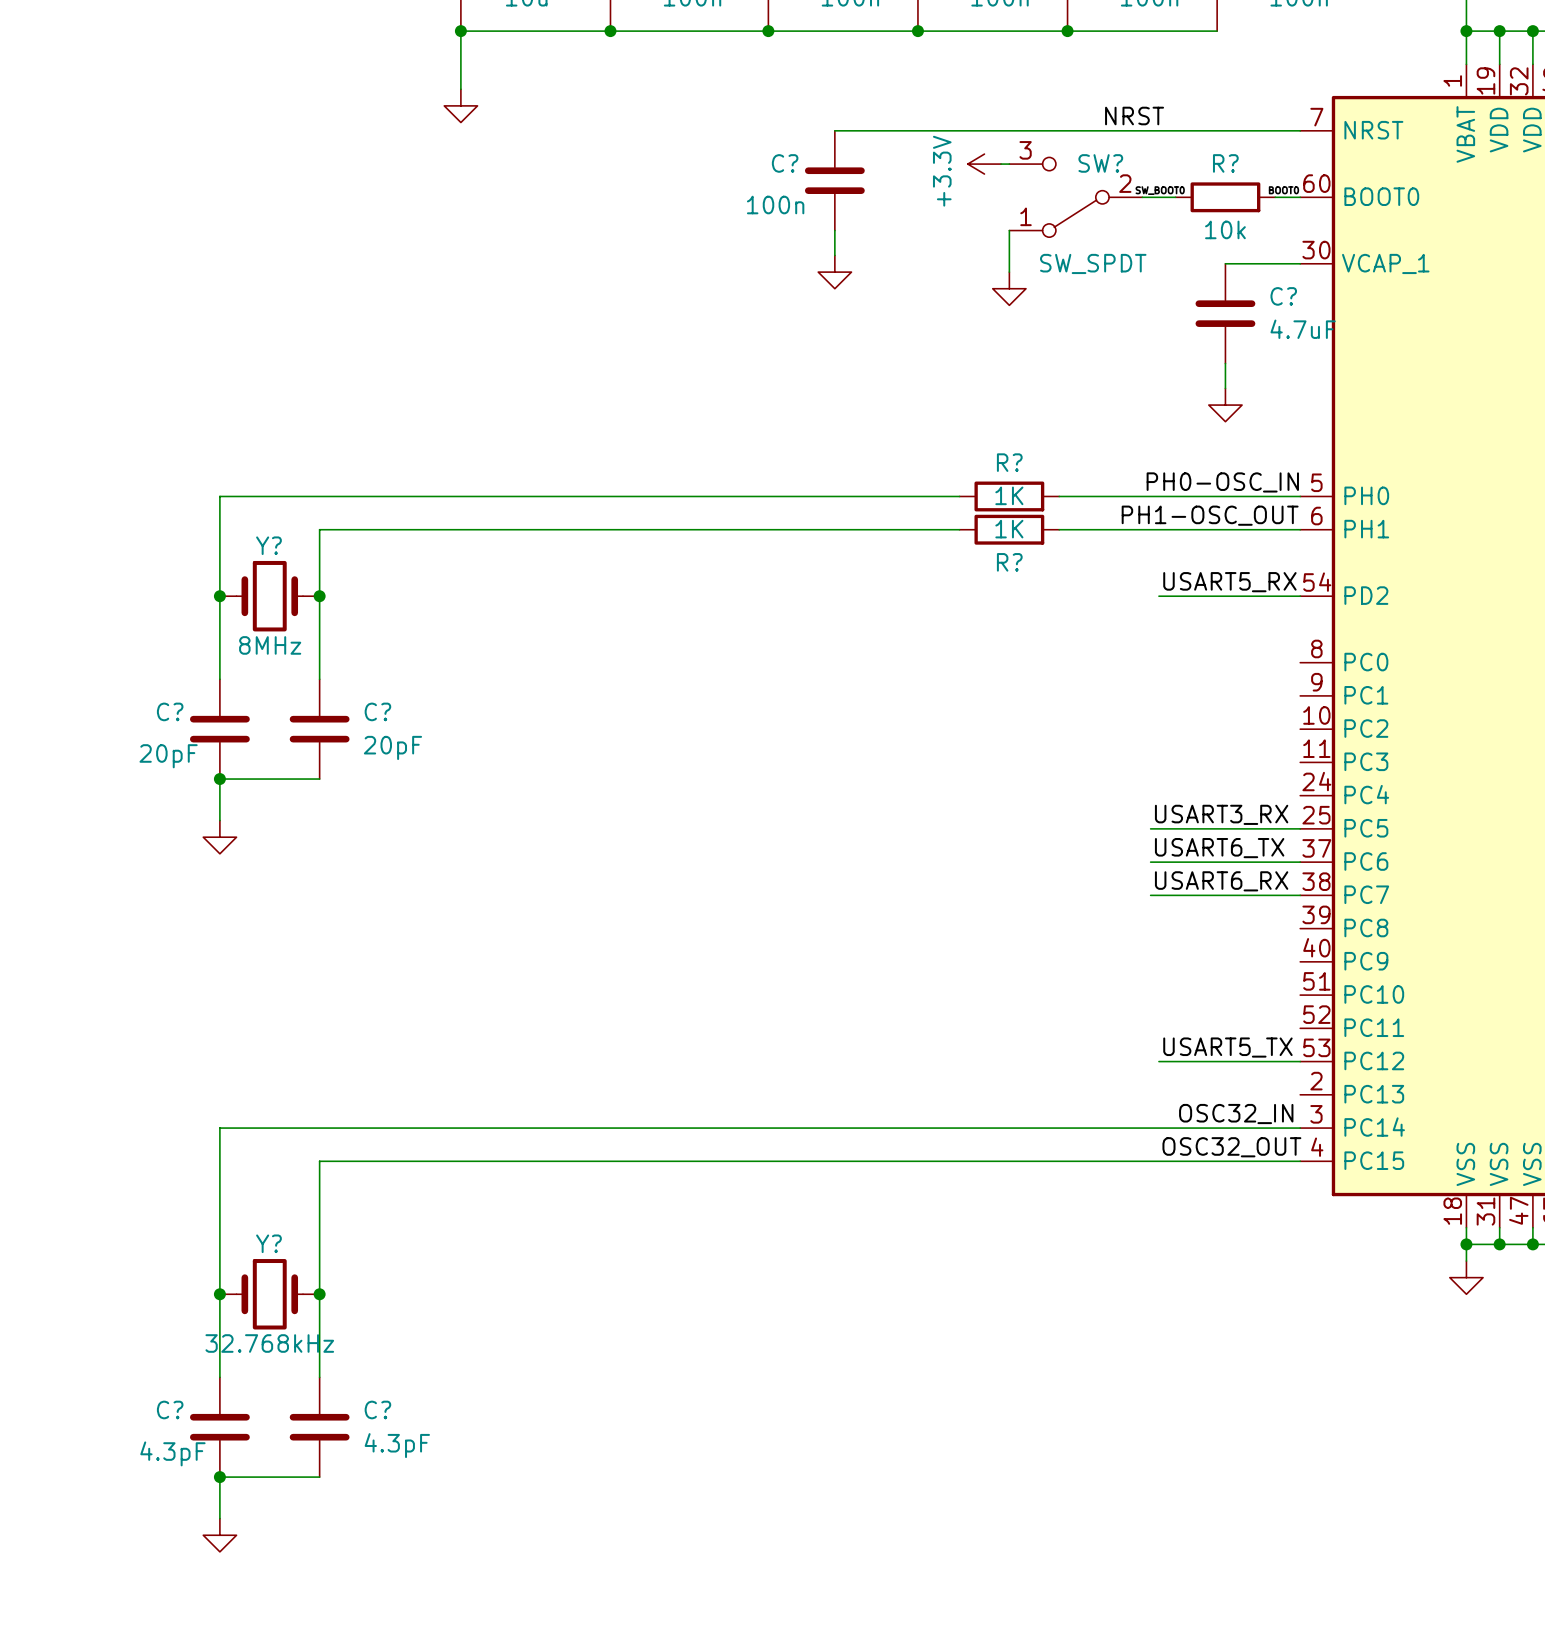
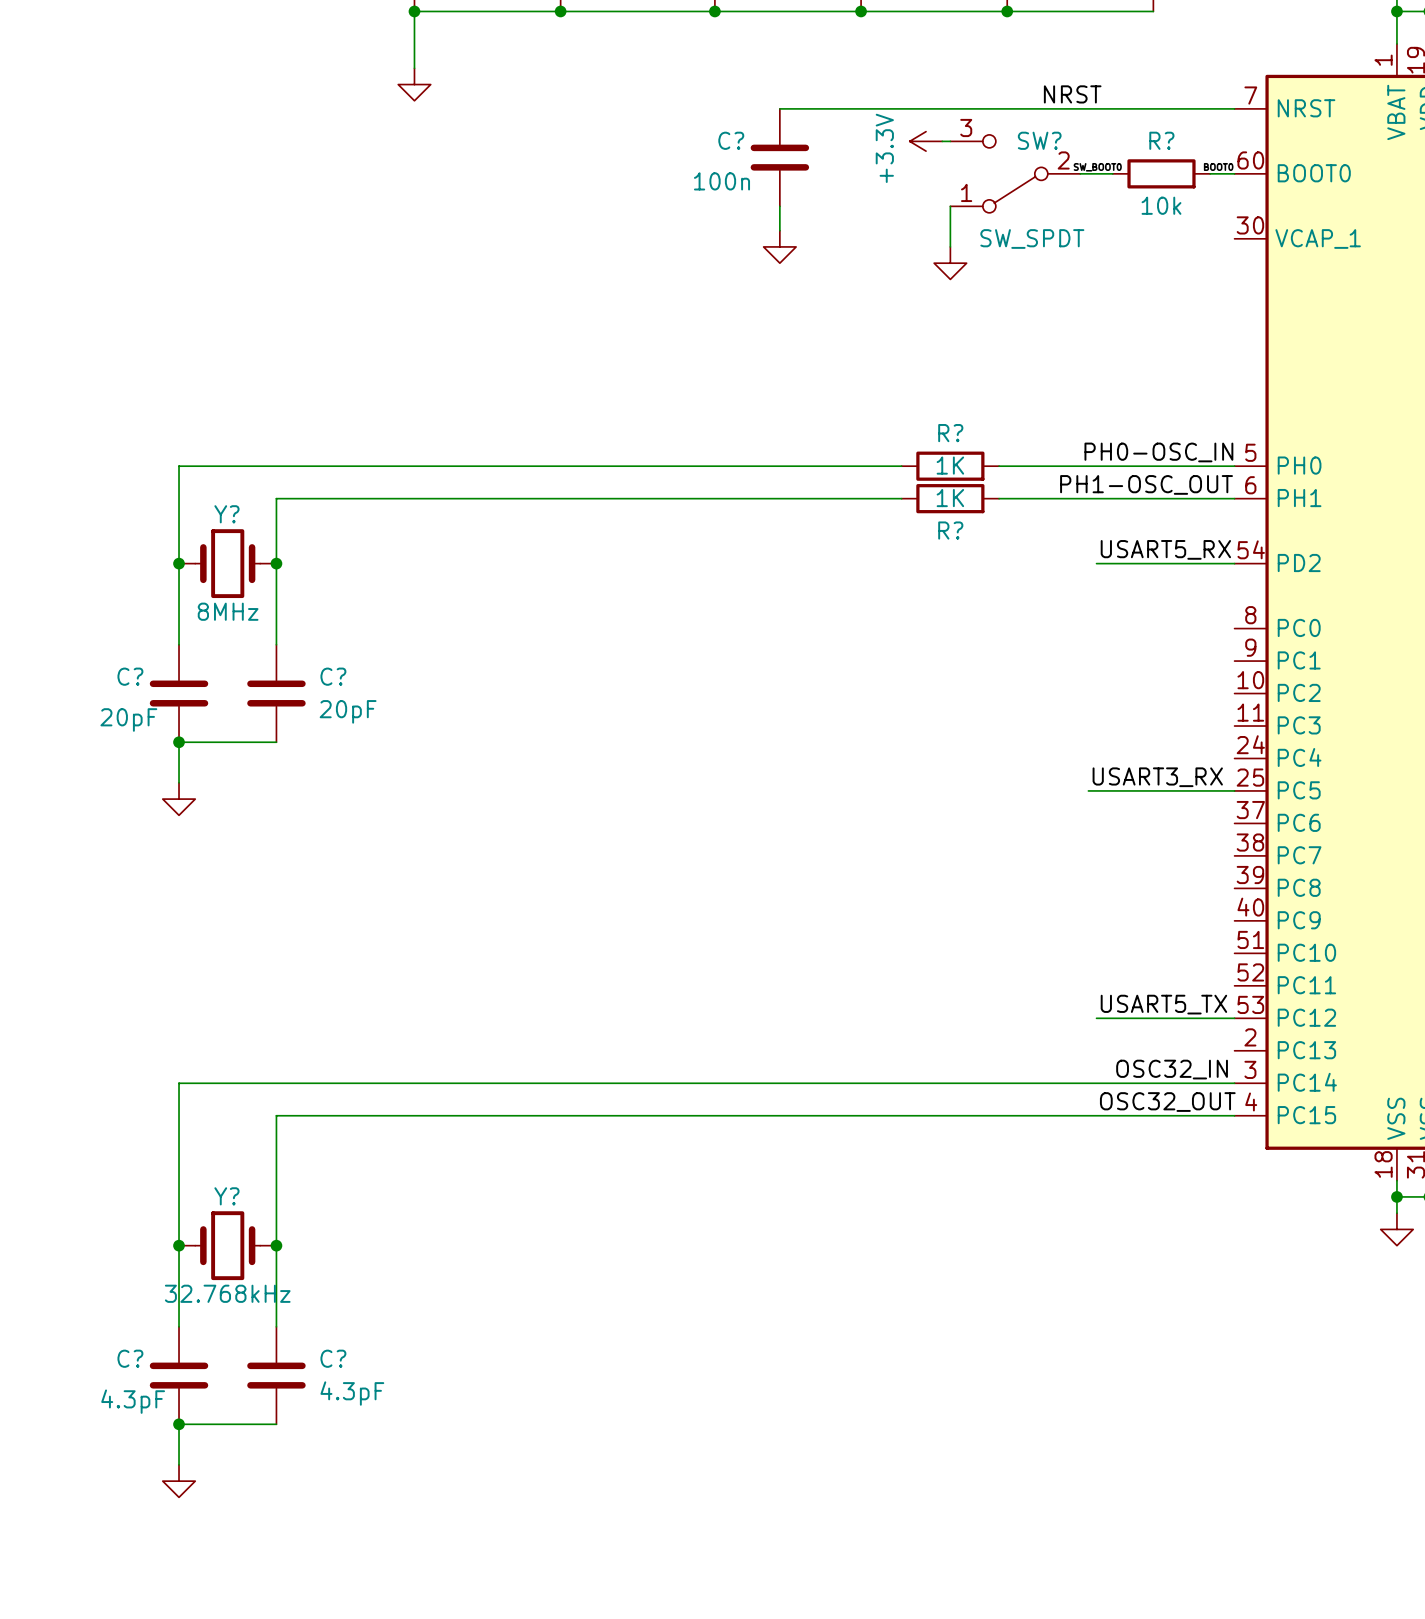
wire: (1225, 263) (1300, 263) -> none
C?: 4.7uF (1225, 313) -> none
wire: (1225, 363) (1225, 388) -> none
power symbol: (1225, 405) -> none
label: USART6_TX (1219, 848) -> none
wire: (1150, 862) (1300, 862) -> none
label: USART6_RX (1221, 881) -> none
wire: (1150, 895) (1300, 895) -> none

